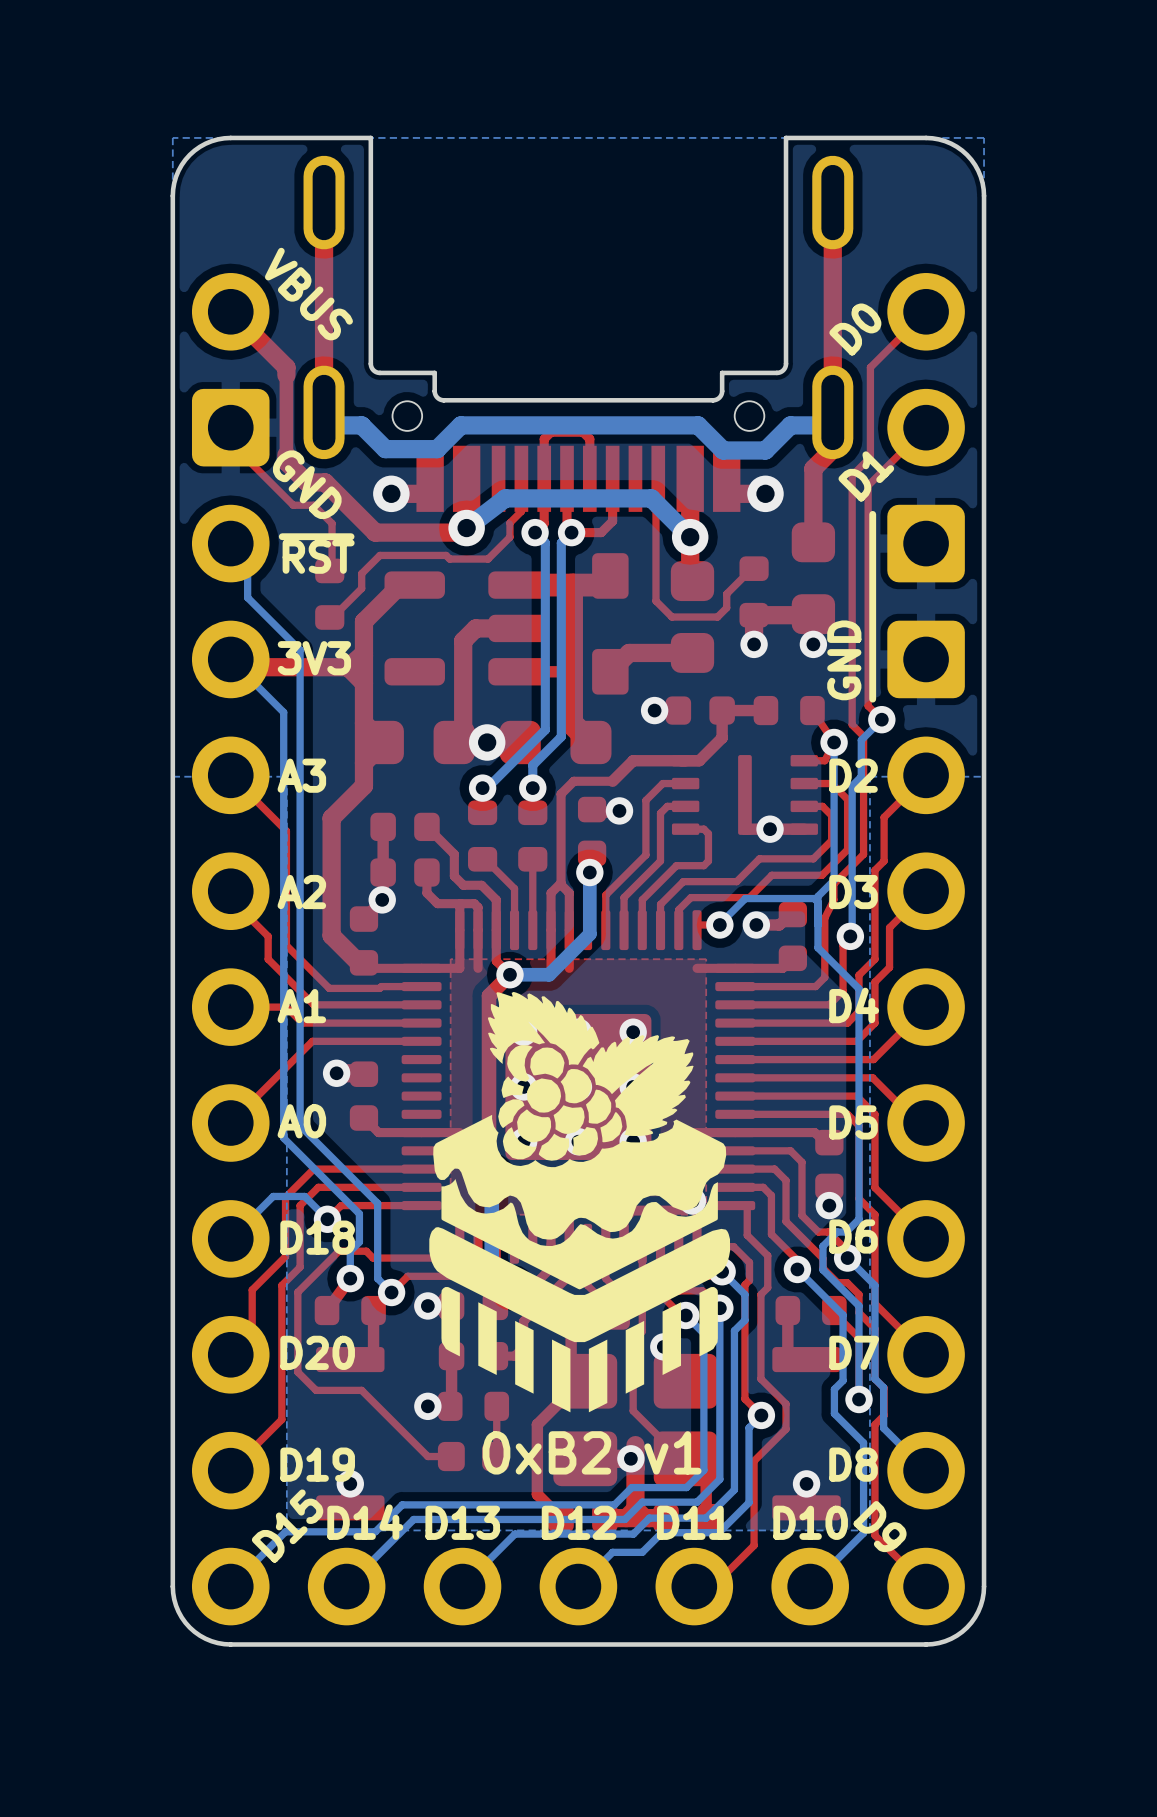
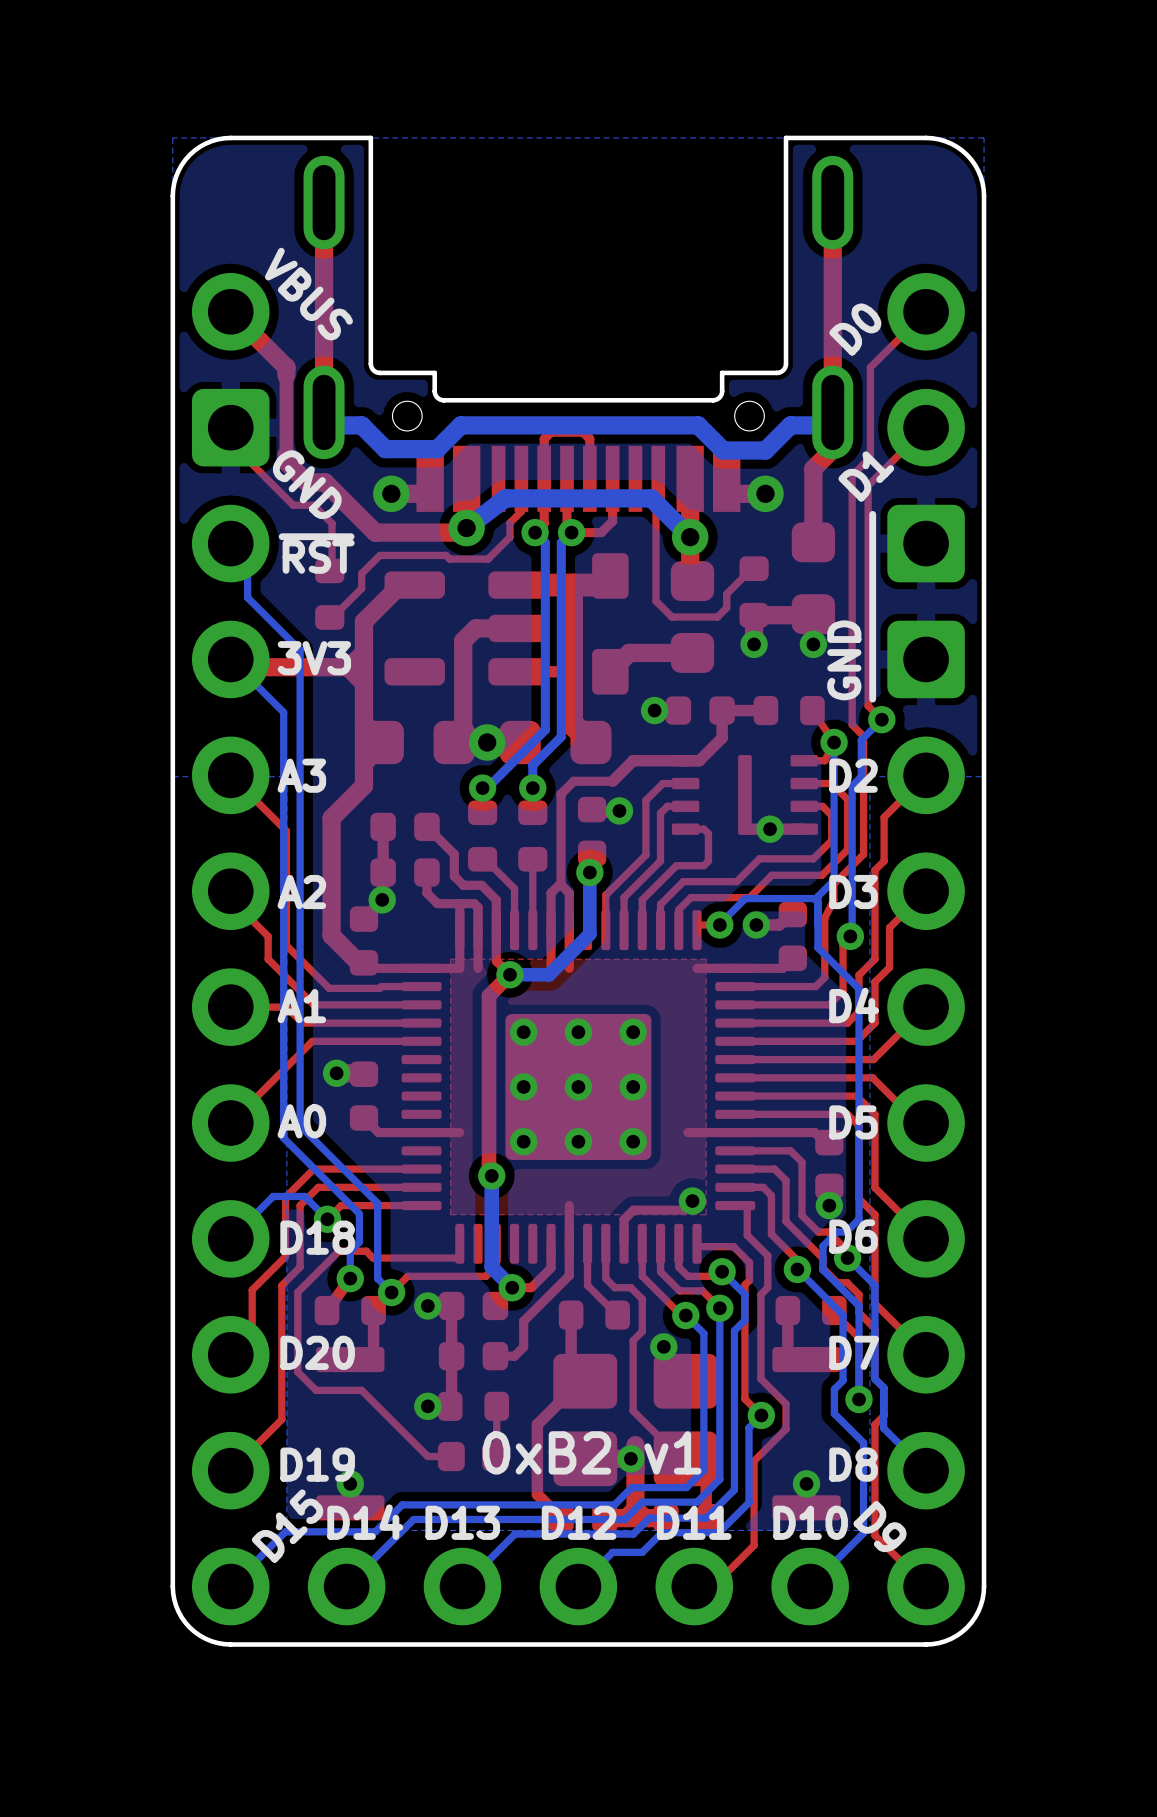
drawing: [429, 991, 731, 1413] -> none

